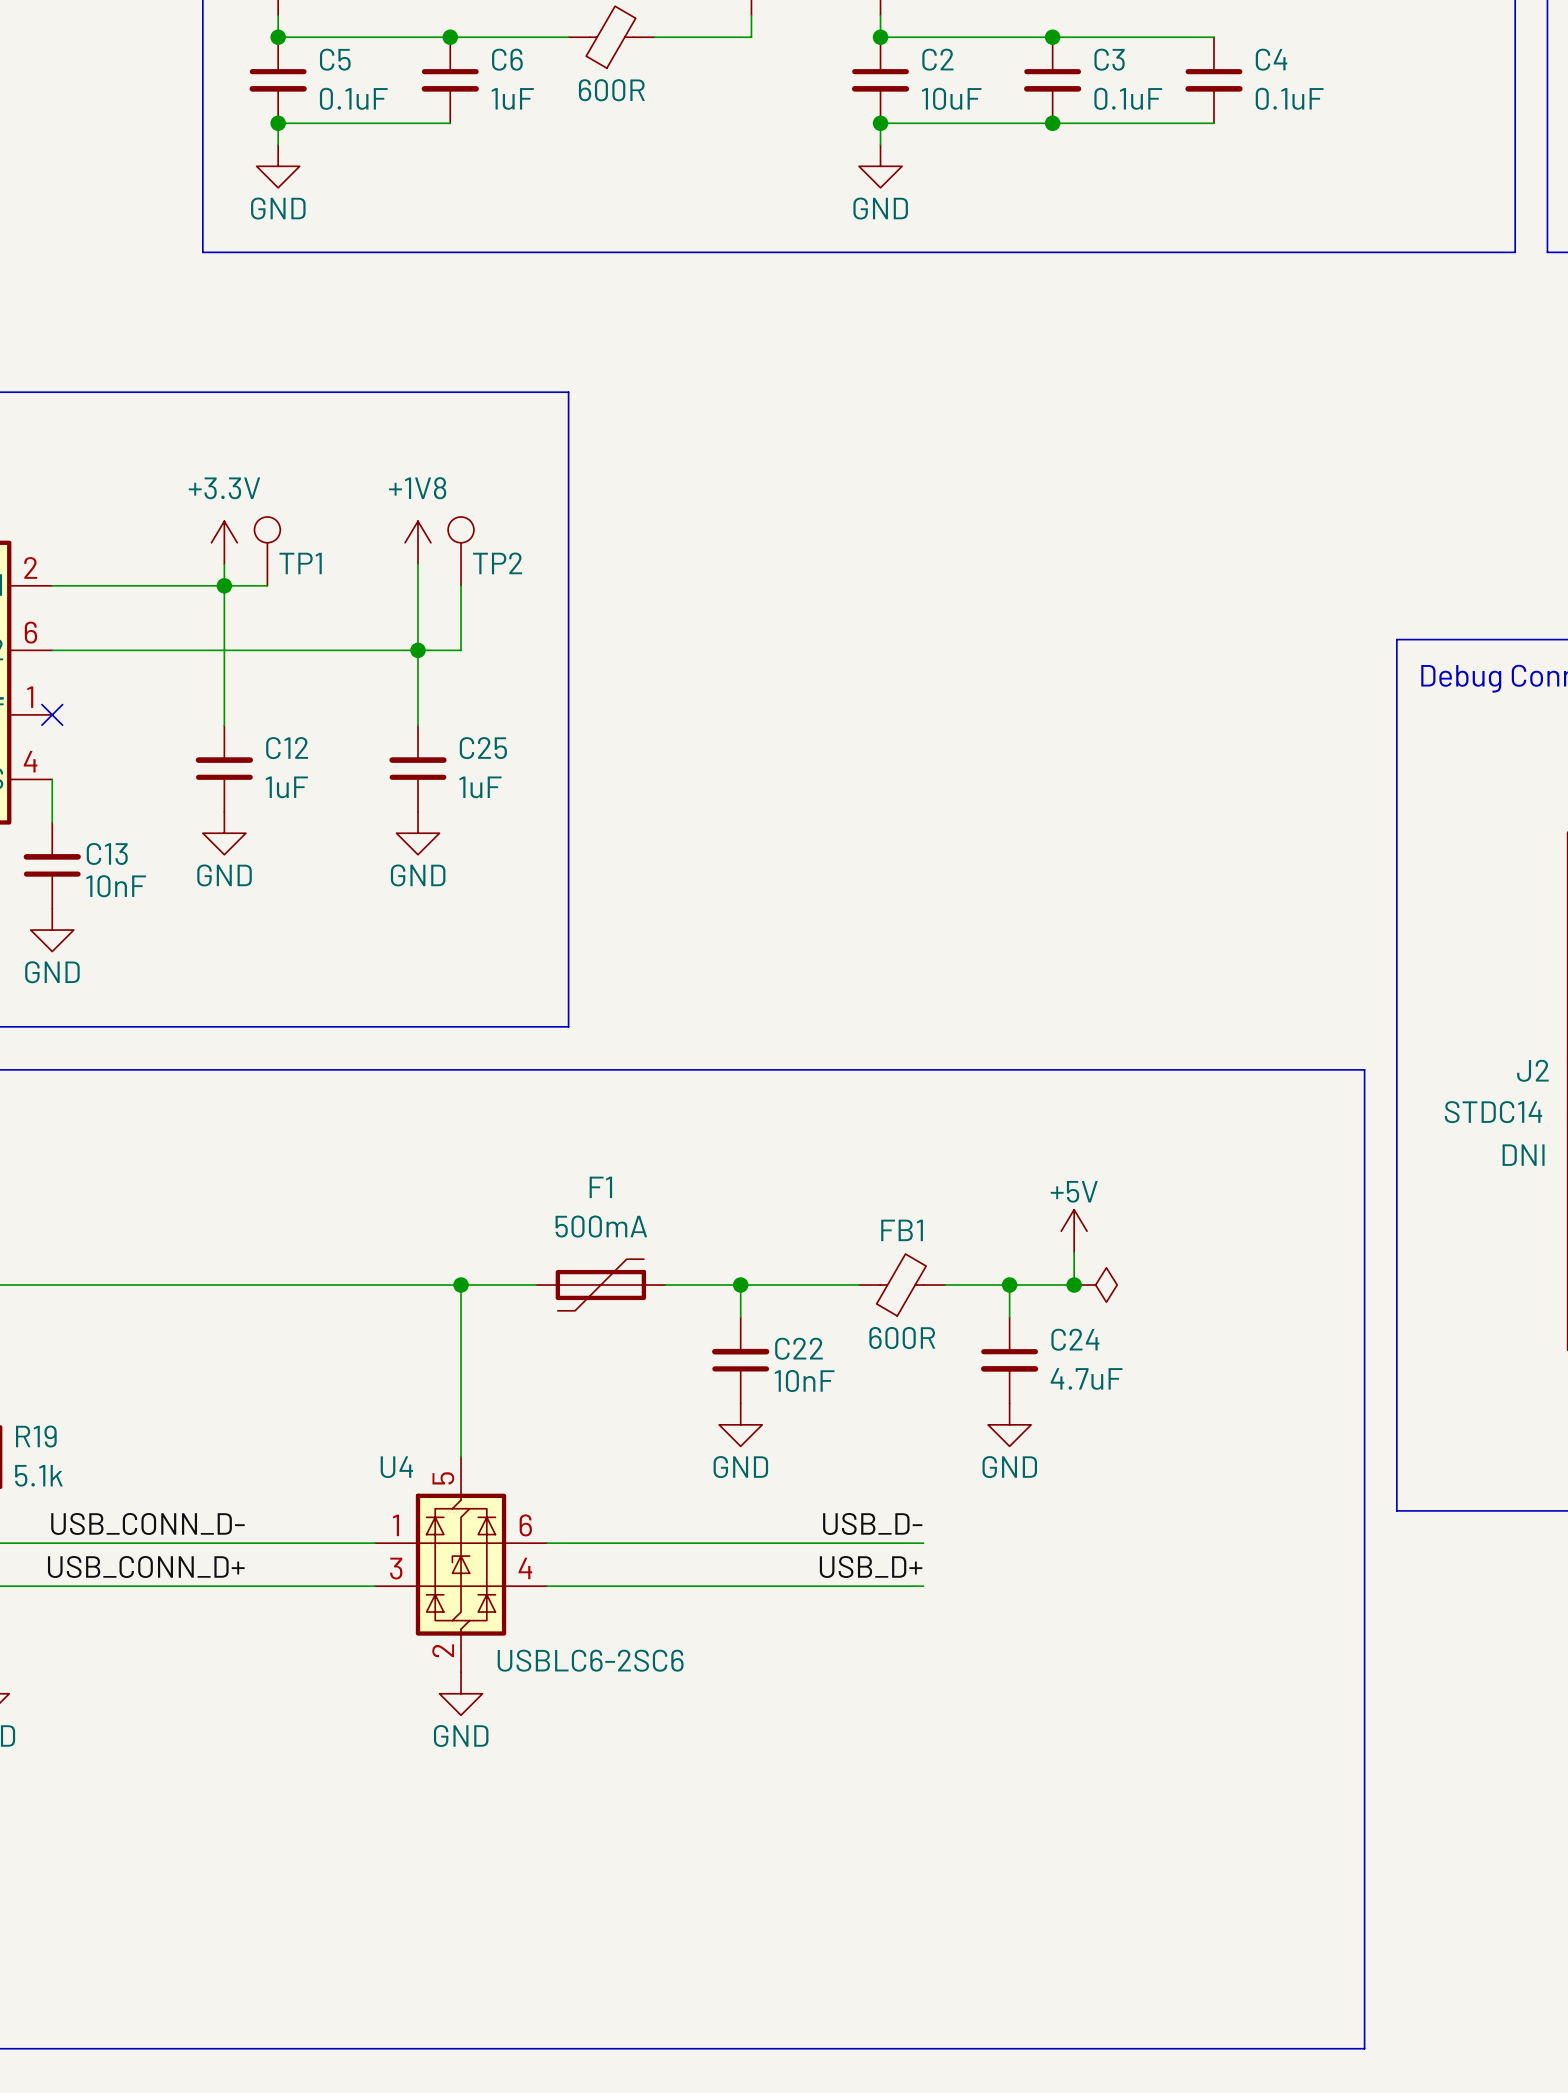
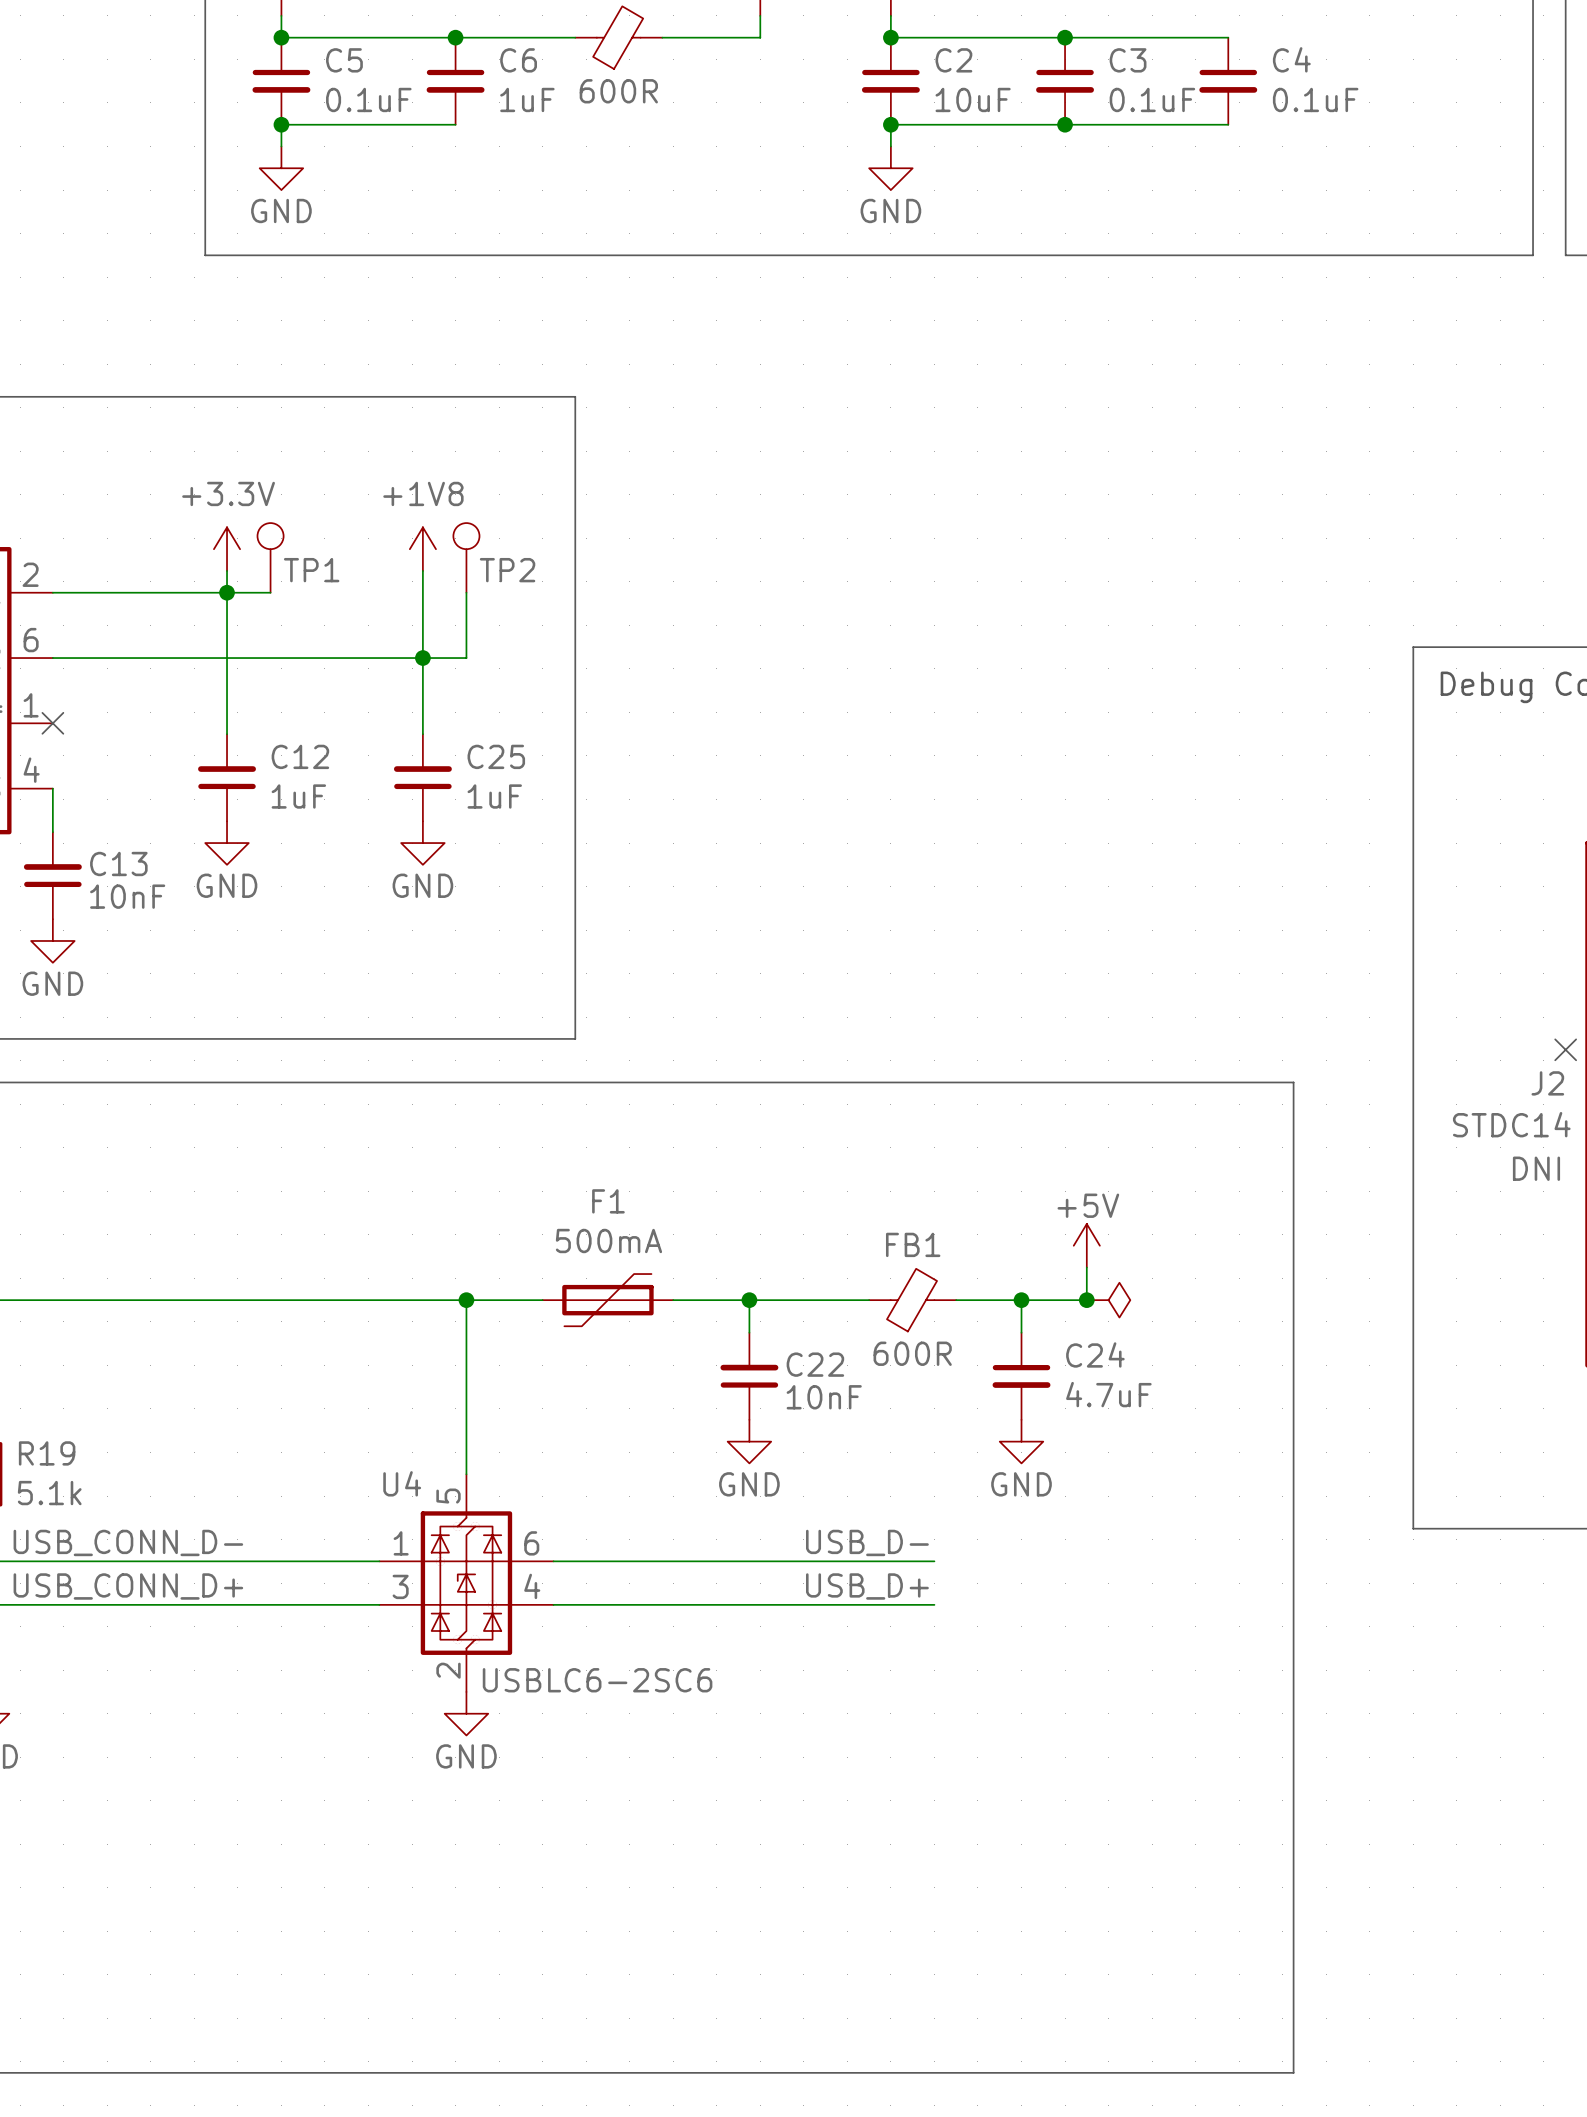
no-connect mark: none -> (1565, 1049)
line: (1278, 1069) (1364, 1069) (1364, 2048) (1278, 2048) -> (1293, 1082) (1293, 2072)

